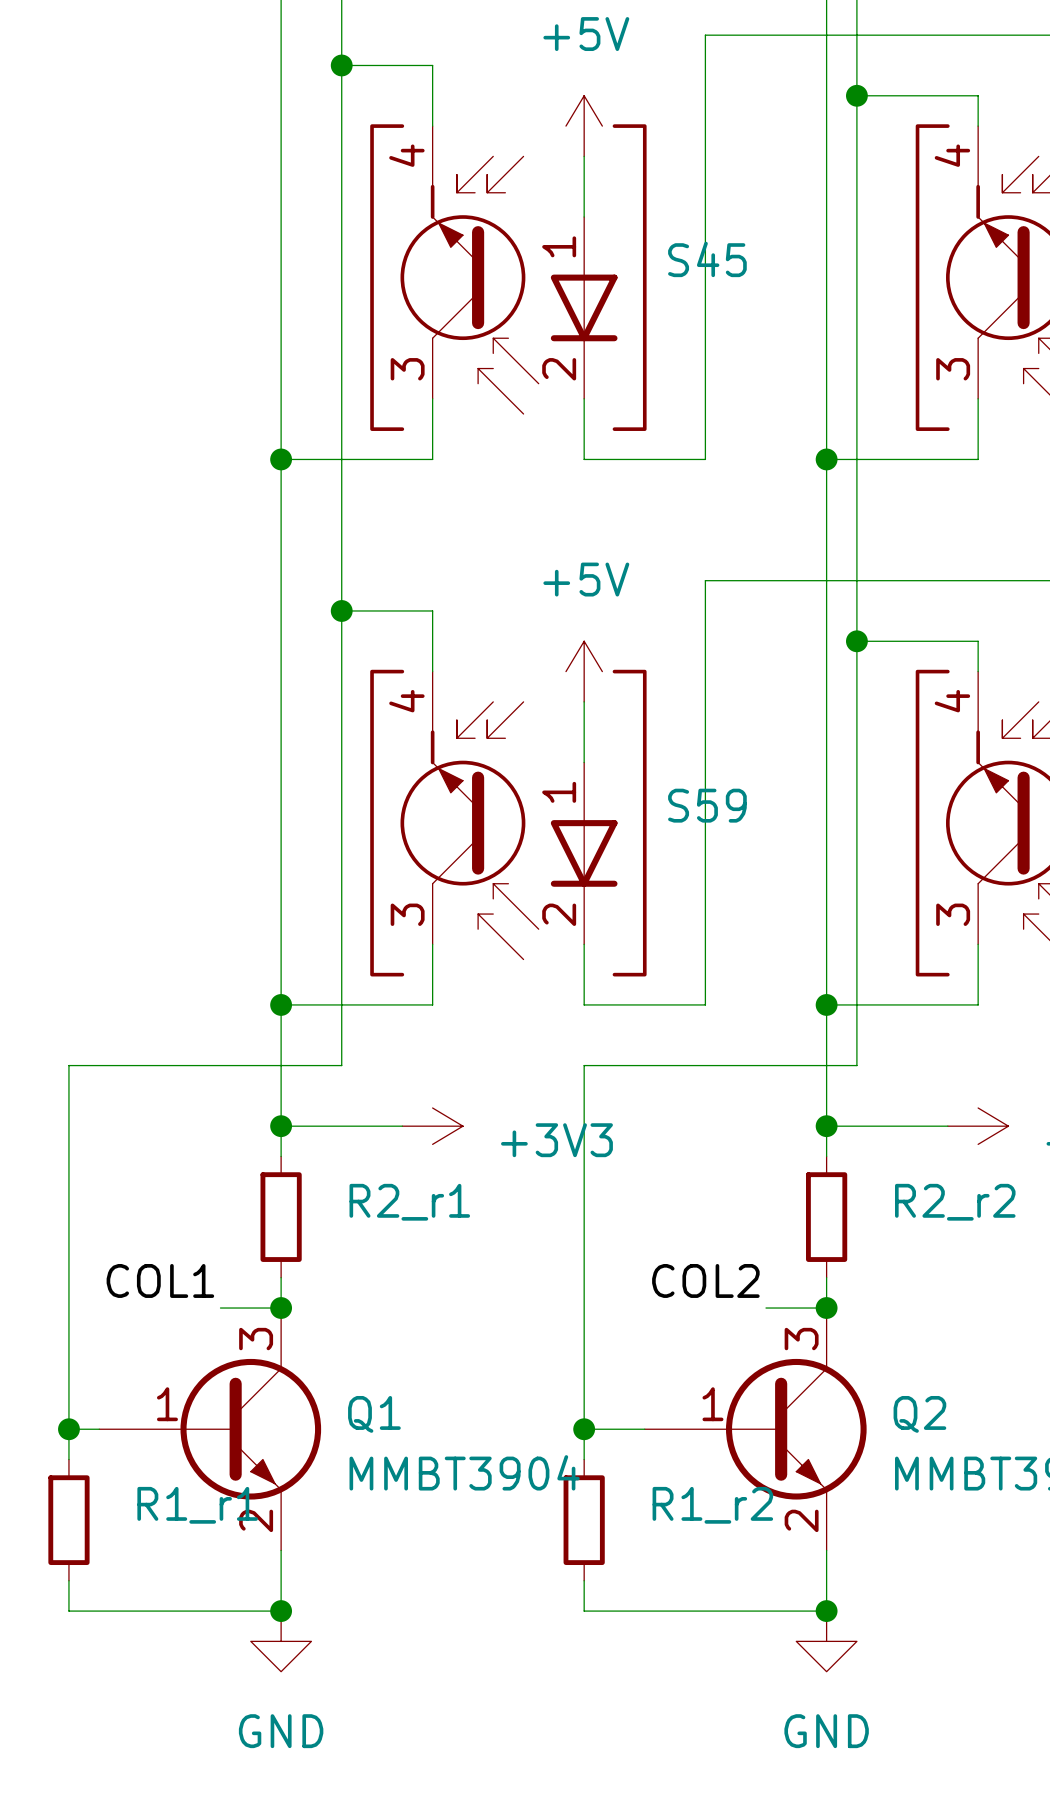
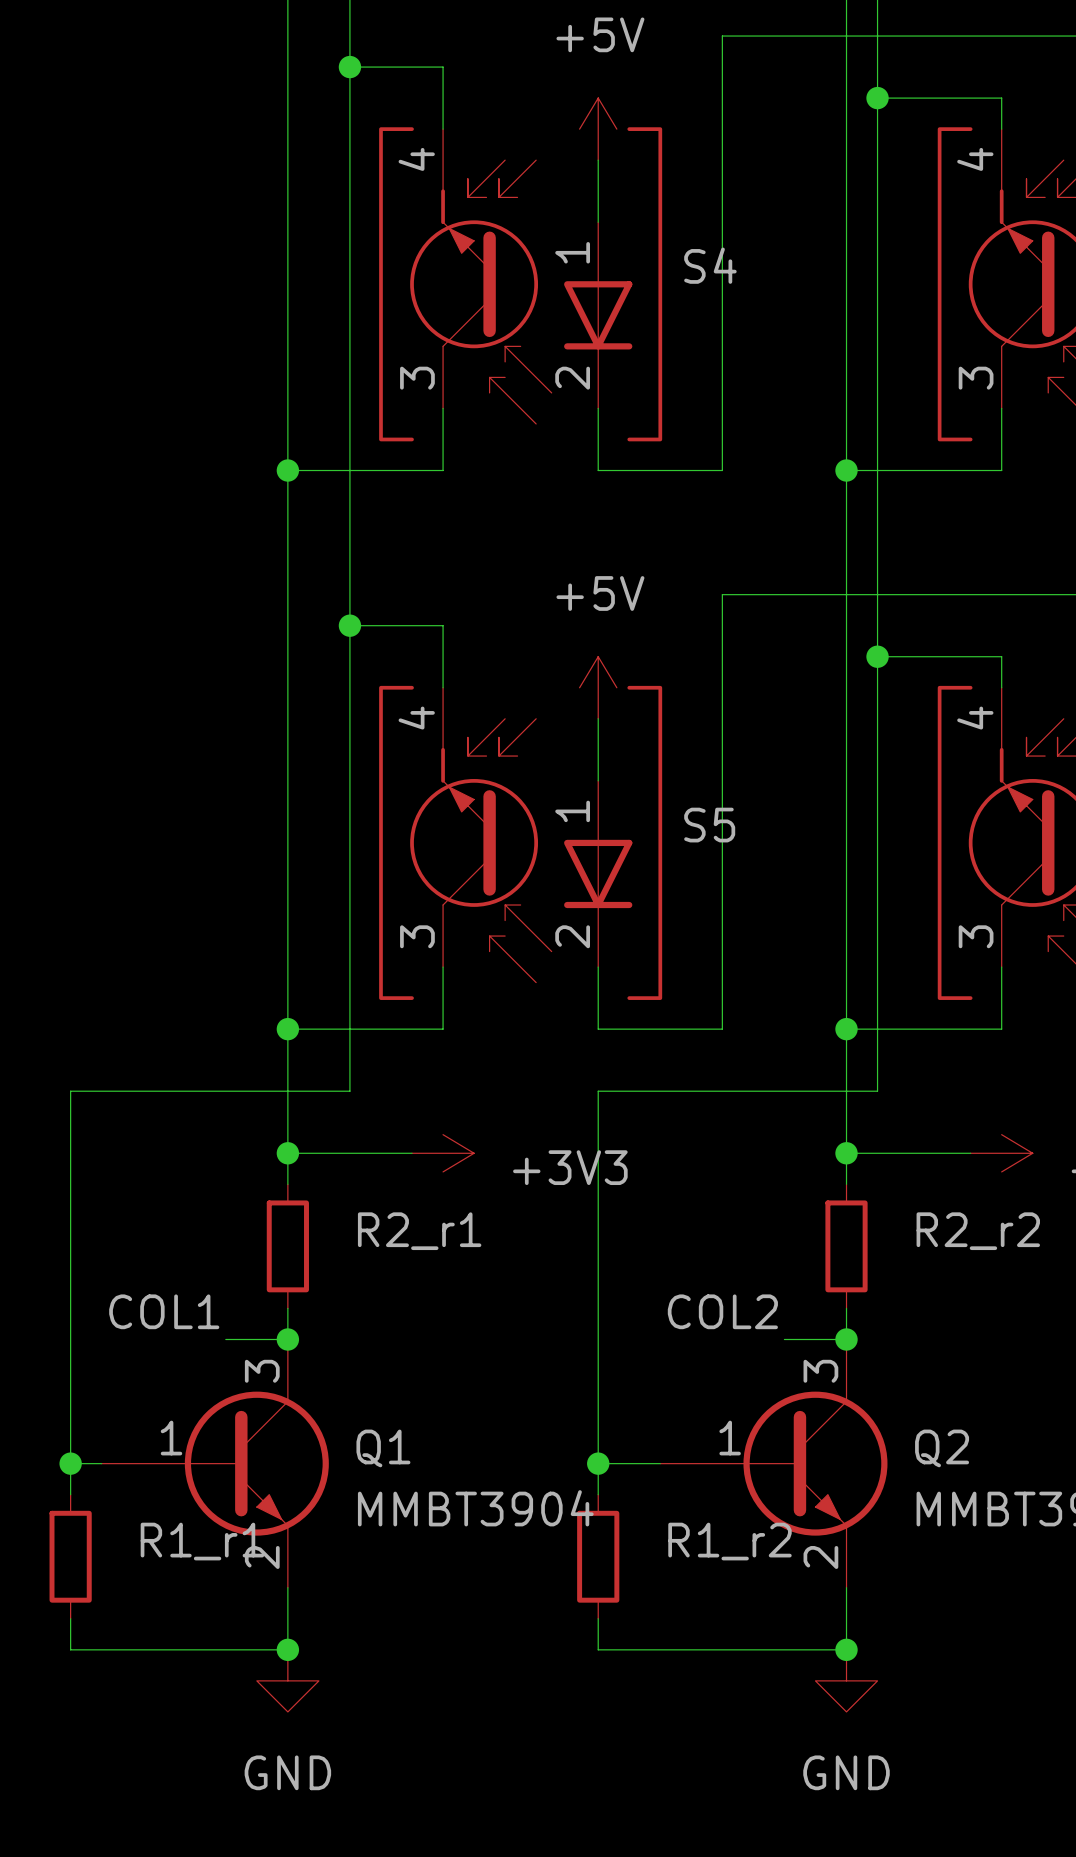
S45 name: S45 (707, 259) -> S4 (710, 265)
S59 name: S59 (707, 805) -> S5 (709, 825)

